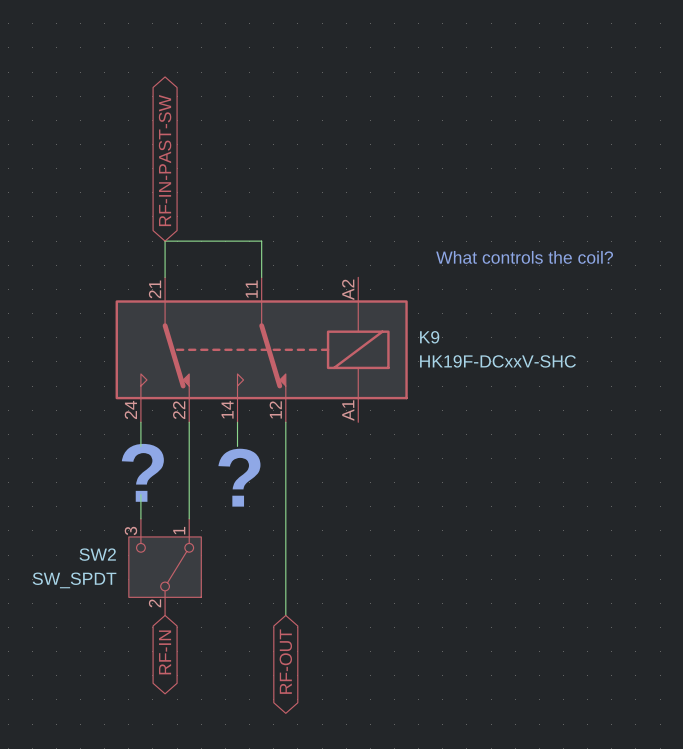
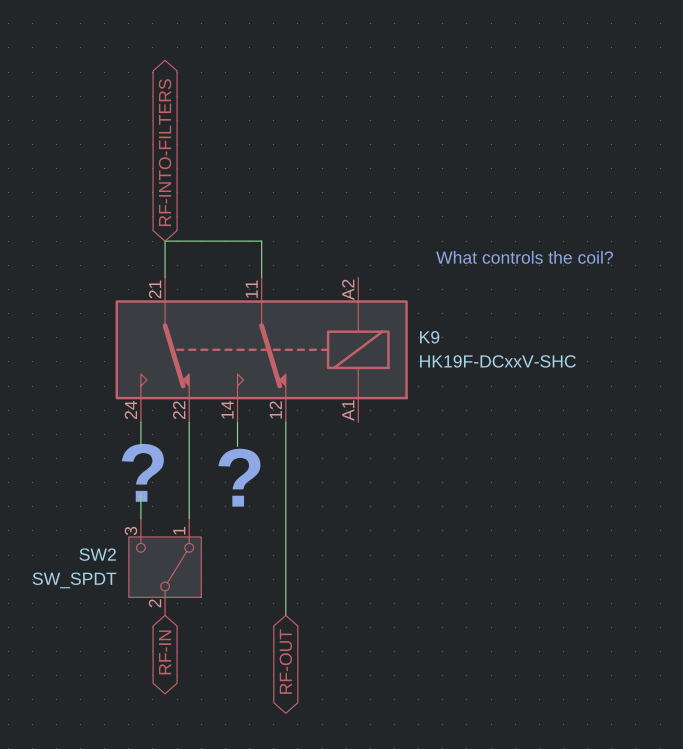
global label: RF-IN-PAST-SW (165, 160) -> RF-INTO-FILTERS (165, 152)

